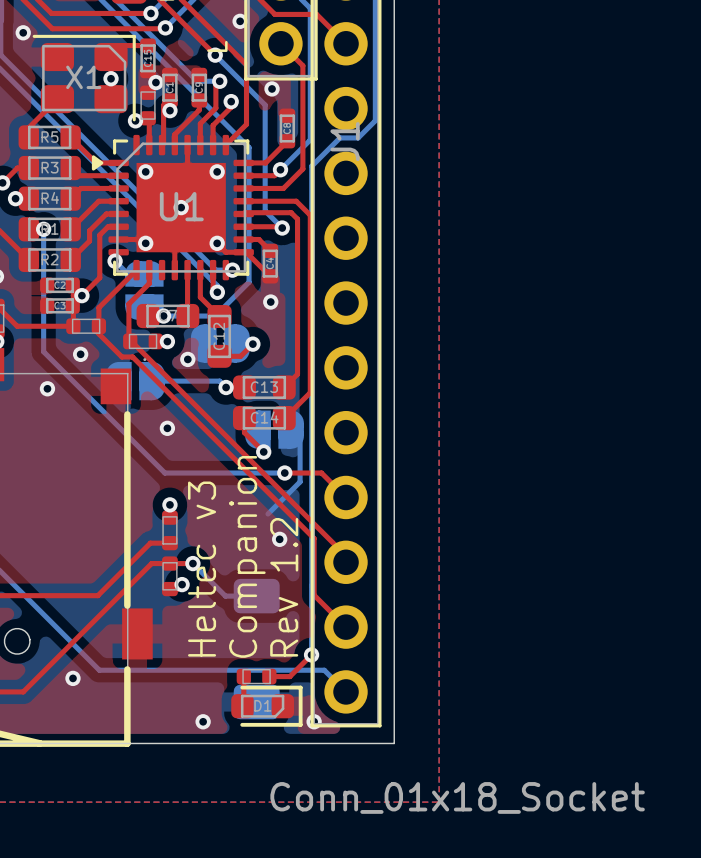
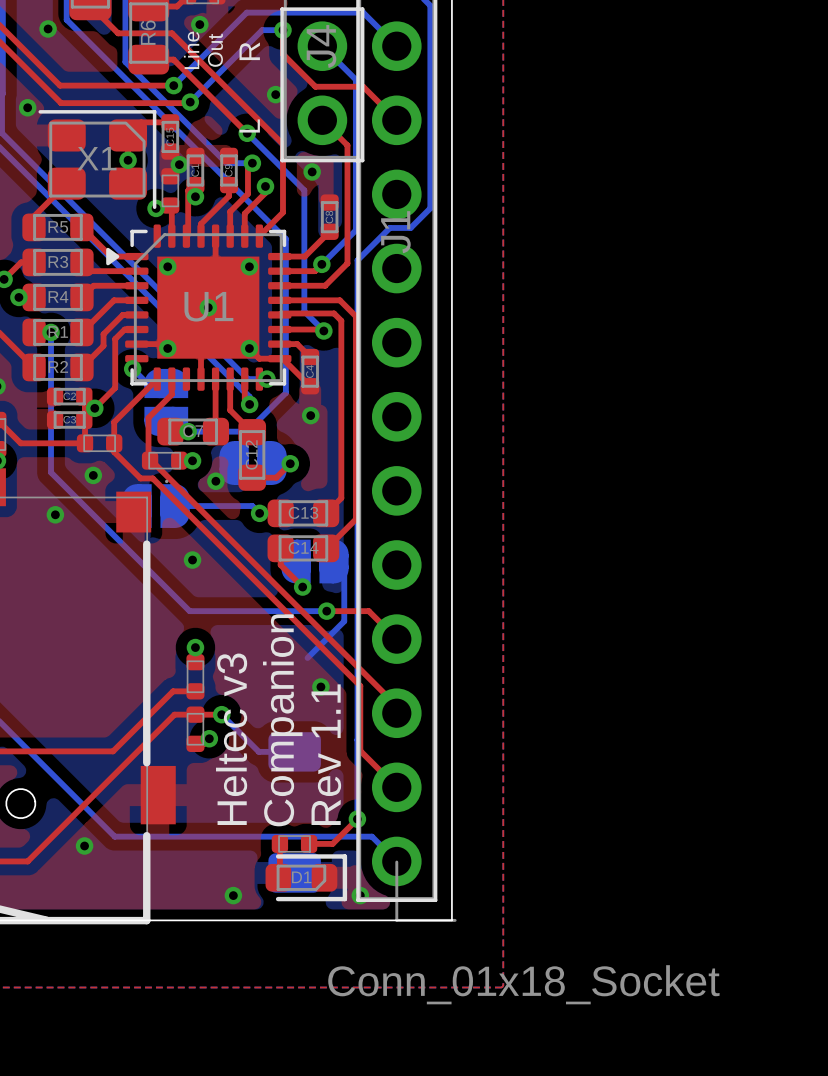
text: Rev 1.2 (284, 587) -> Rev 1.1 (326, 754)
line: none -> (396, 862) (396, 920) (455, 920)

